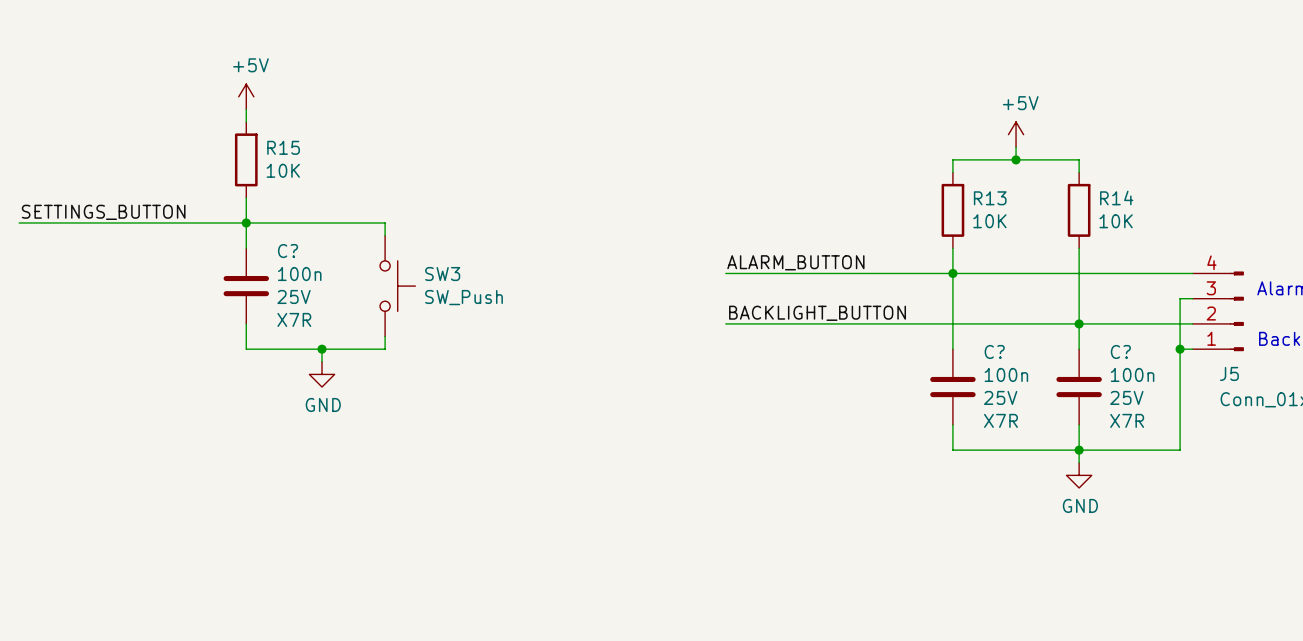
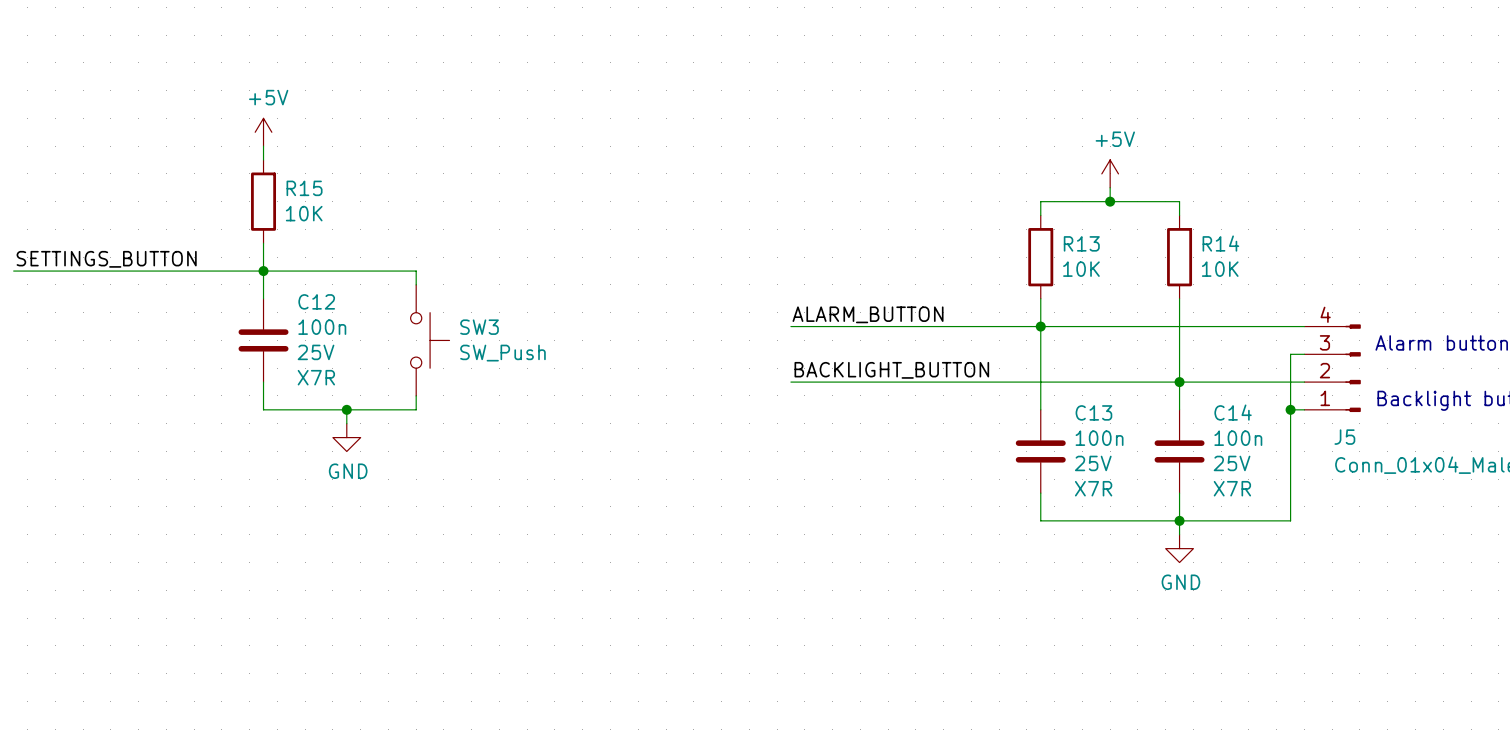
C? name: C? (288, 251) -> C12 (316, 301)
C? name: C? (994, 351) -> C13 (1093, 412)
C? name: C? (1120, 351) -> C14 (1233, 412)

